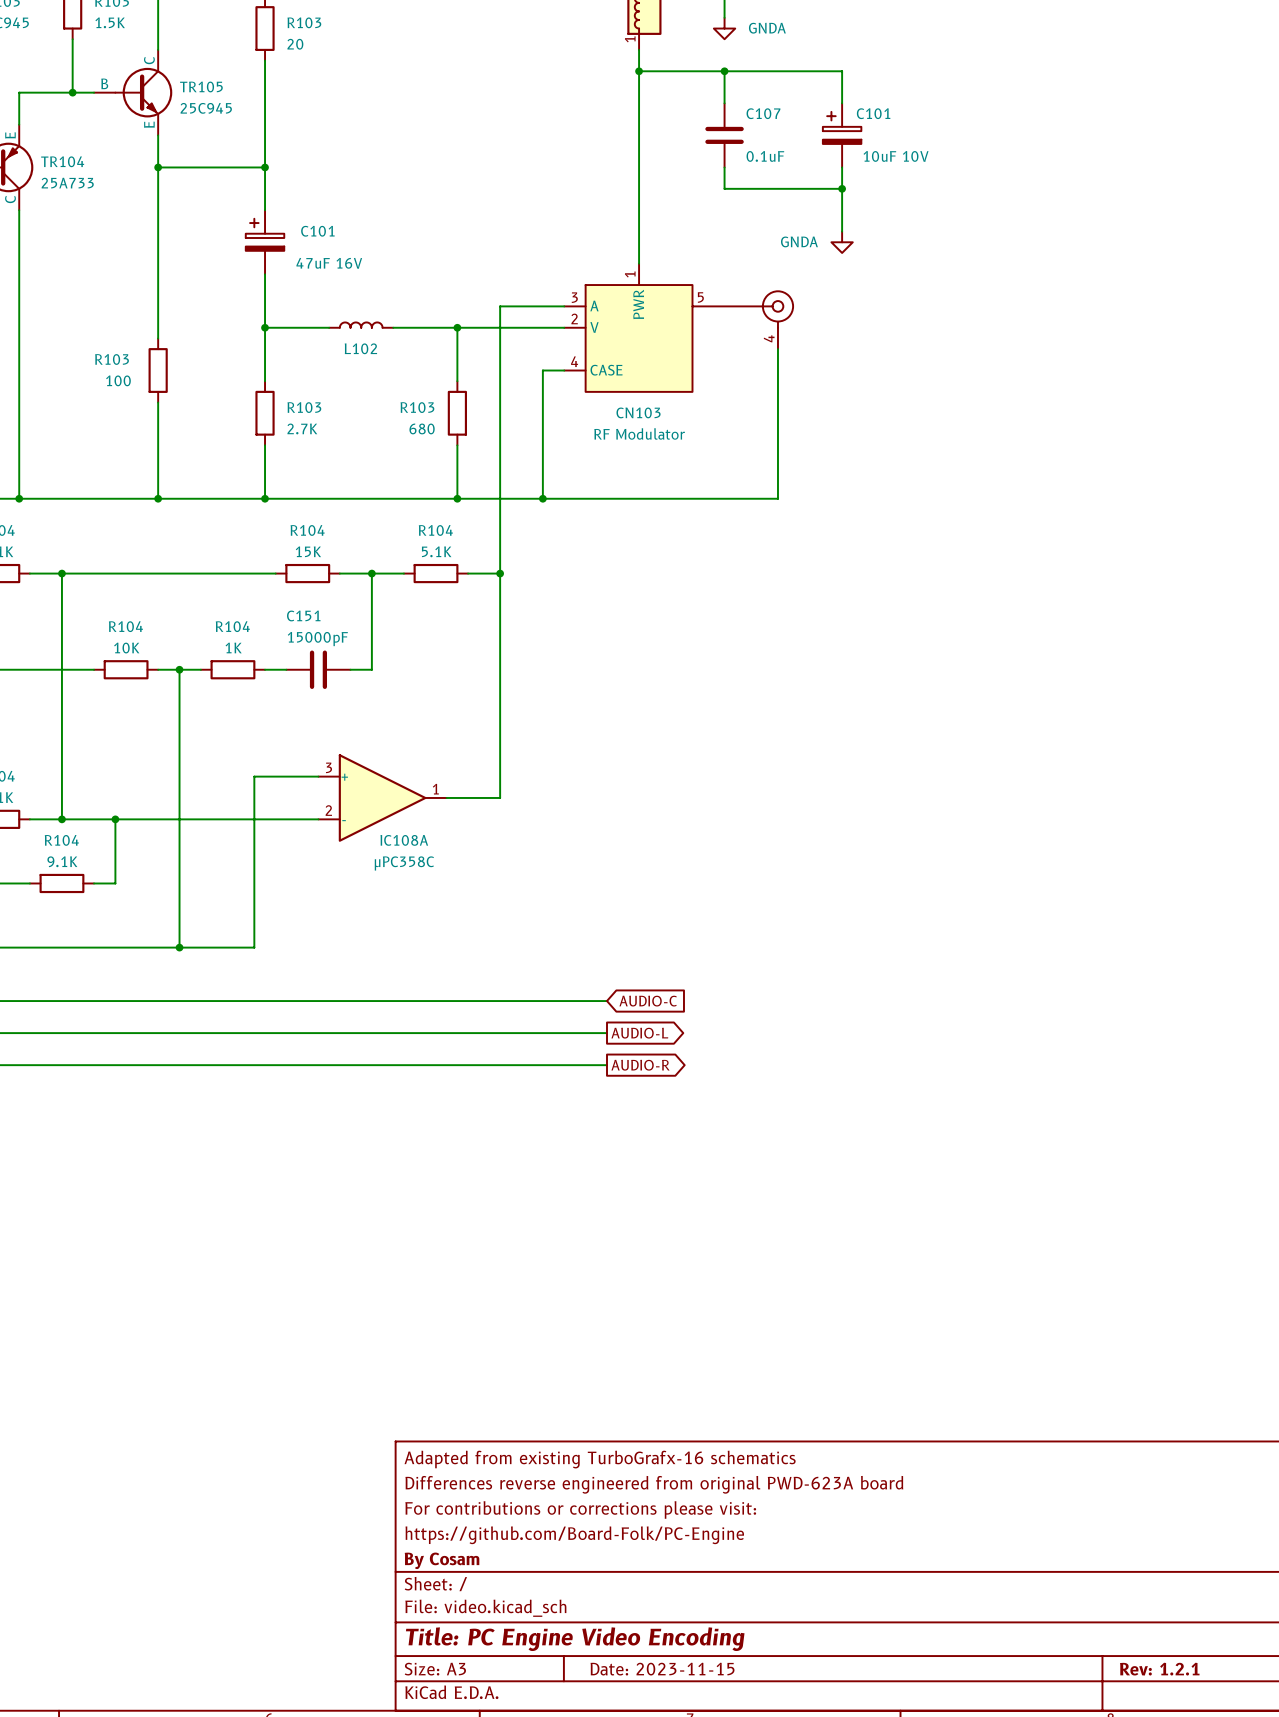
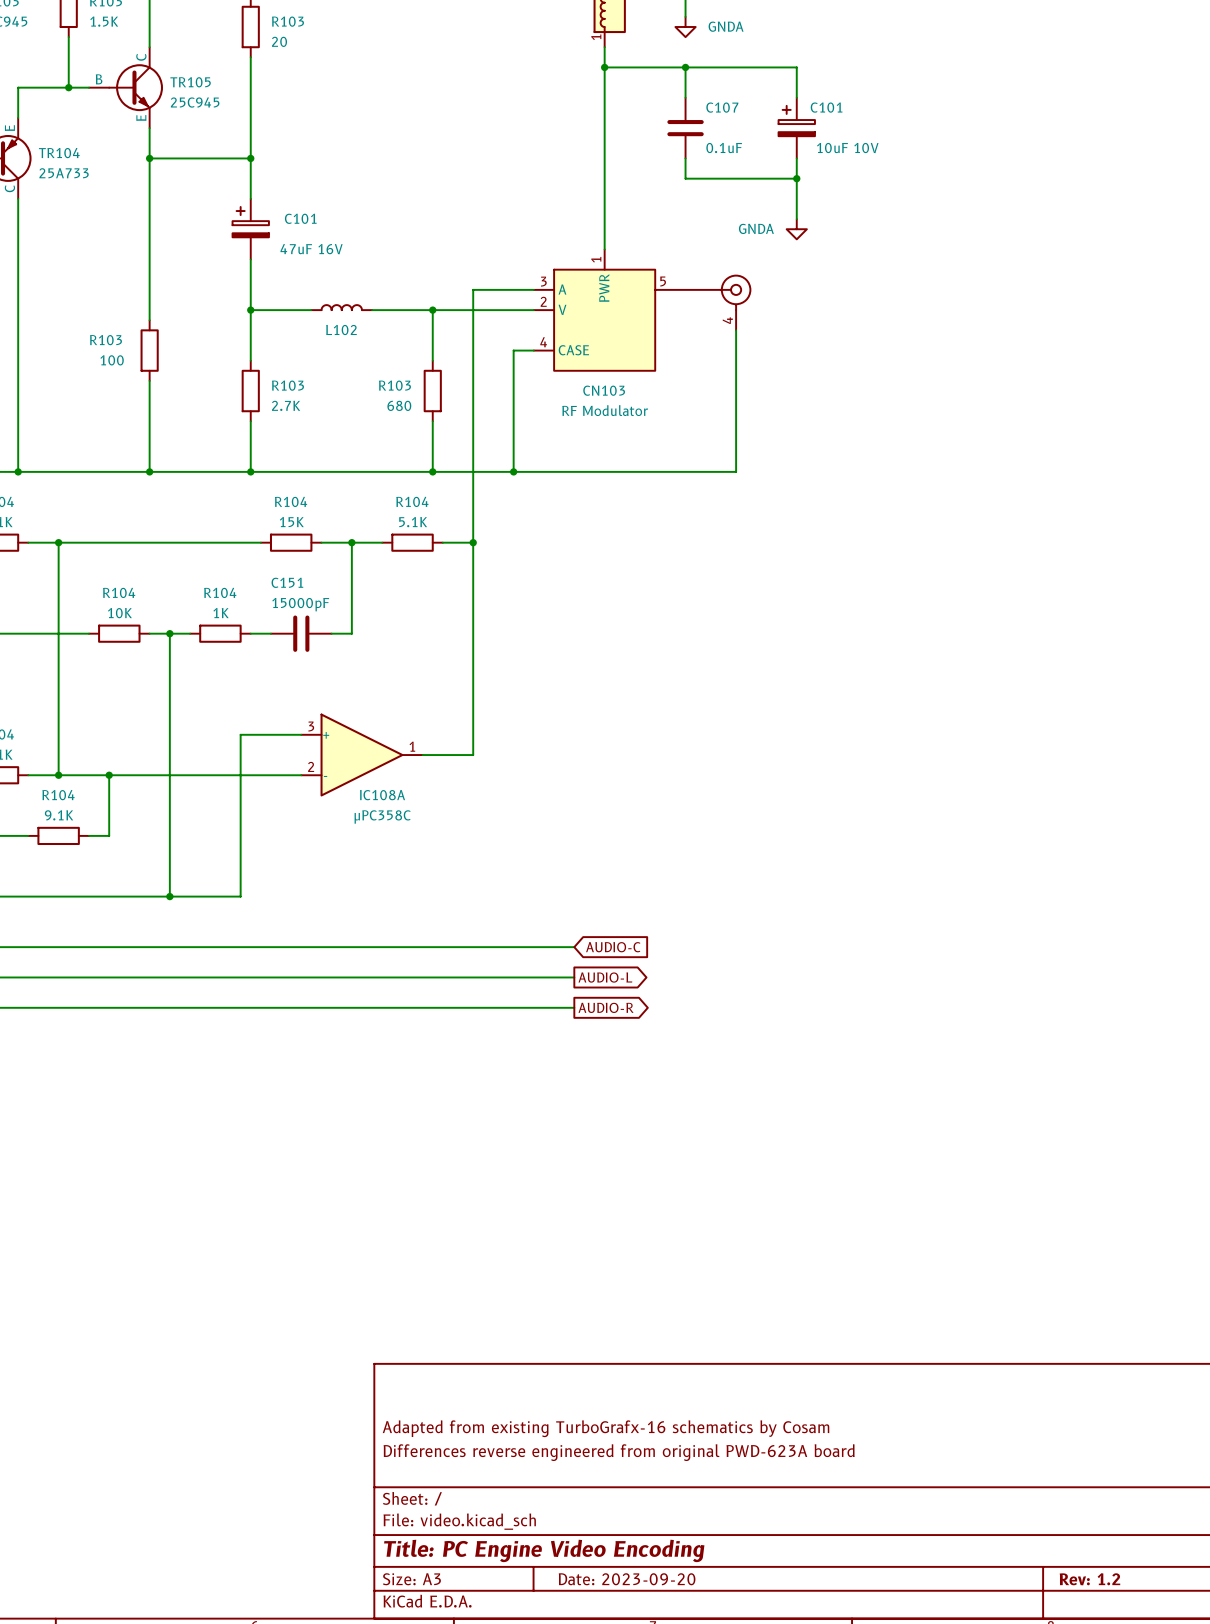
title block: Adapted from existing TurboGrafx-16 schematics (600, 1459) -> none
title block: Differences reverse engineered from original PWD-623A board (654, 1484) -> none
title block: For contributions or corrections please visit: (580, 1509) -> Adapted from existing TurboGrafx-16 schematics by Cosam (606, 1428)
title block: https://github.com/Board-Folk/PC-Engine (574, 1535) -> Differences reverse engineered from original PWD-623A board (619, 1452)
title block: By Cosam (442, 1560) -> none
title block: Date: 2023-11-15 (662, 1669) -> Date: 2023-09-20 (627, 1579)
title block: Rev: 1.2.1 (1159, 1669) -> Rev: 1.2 (1089, 1579)

